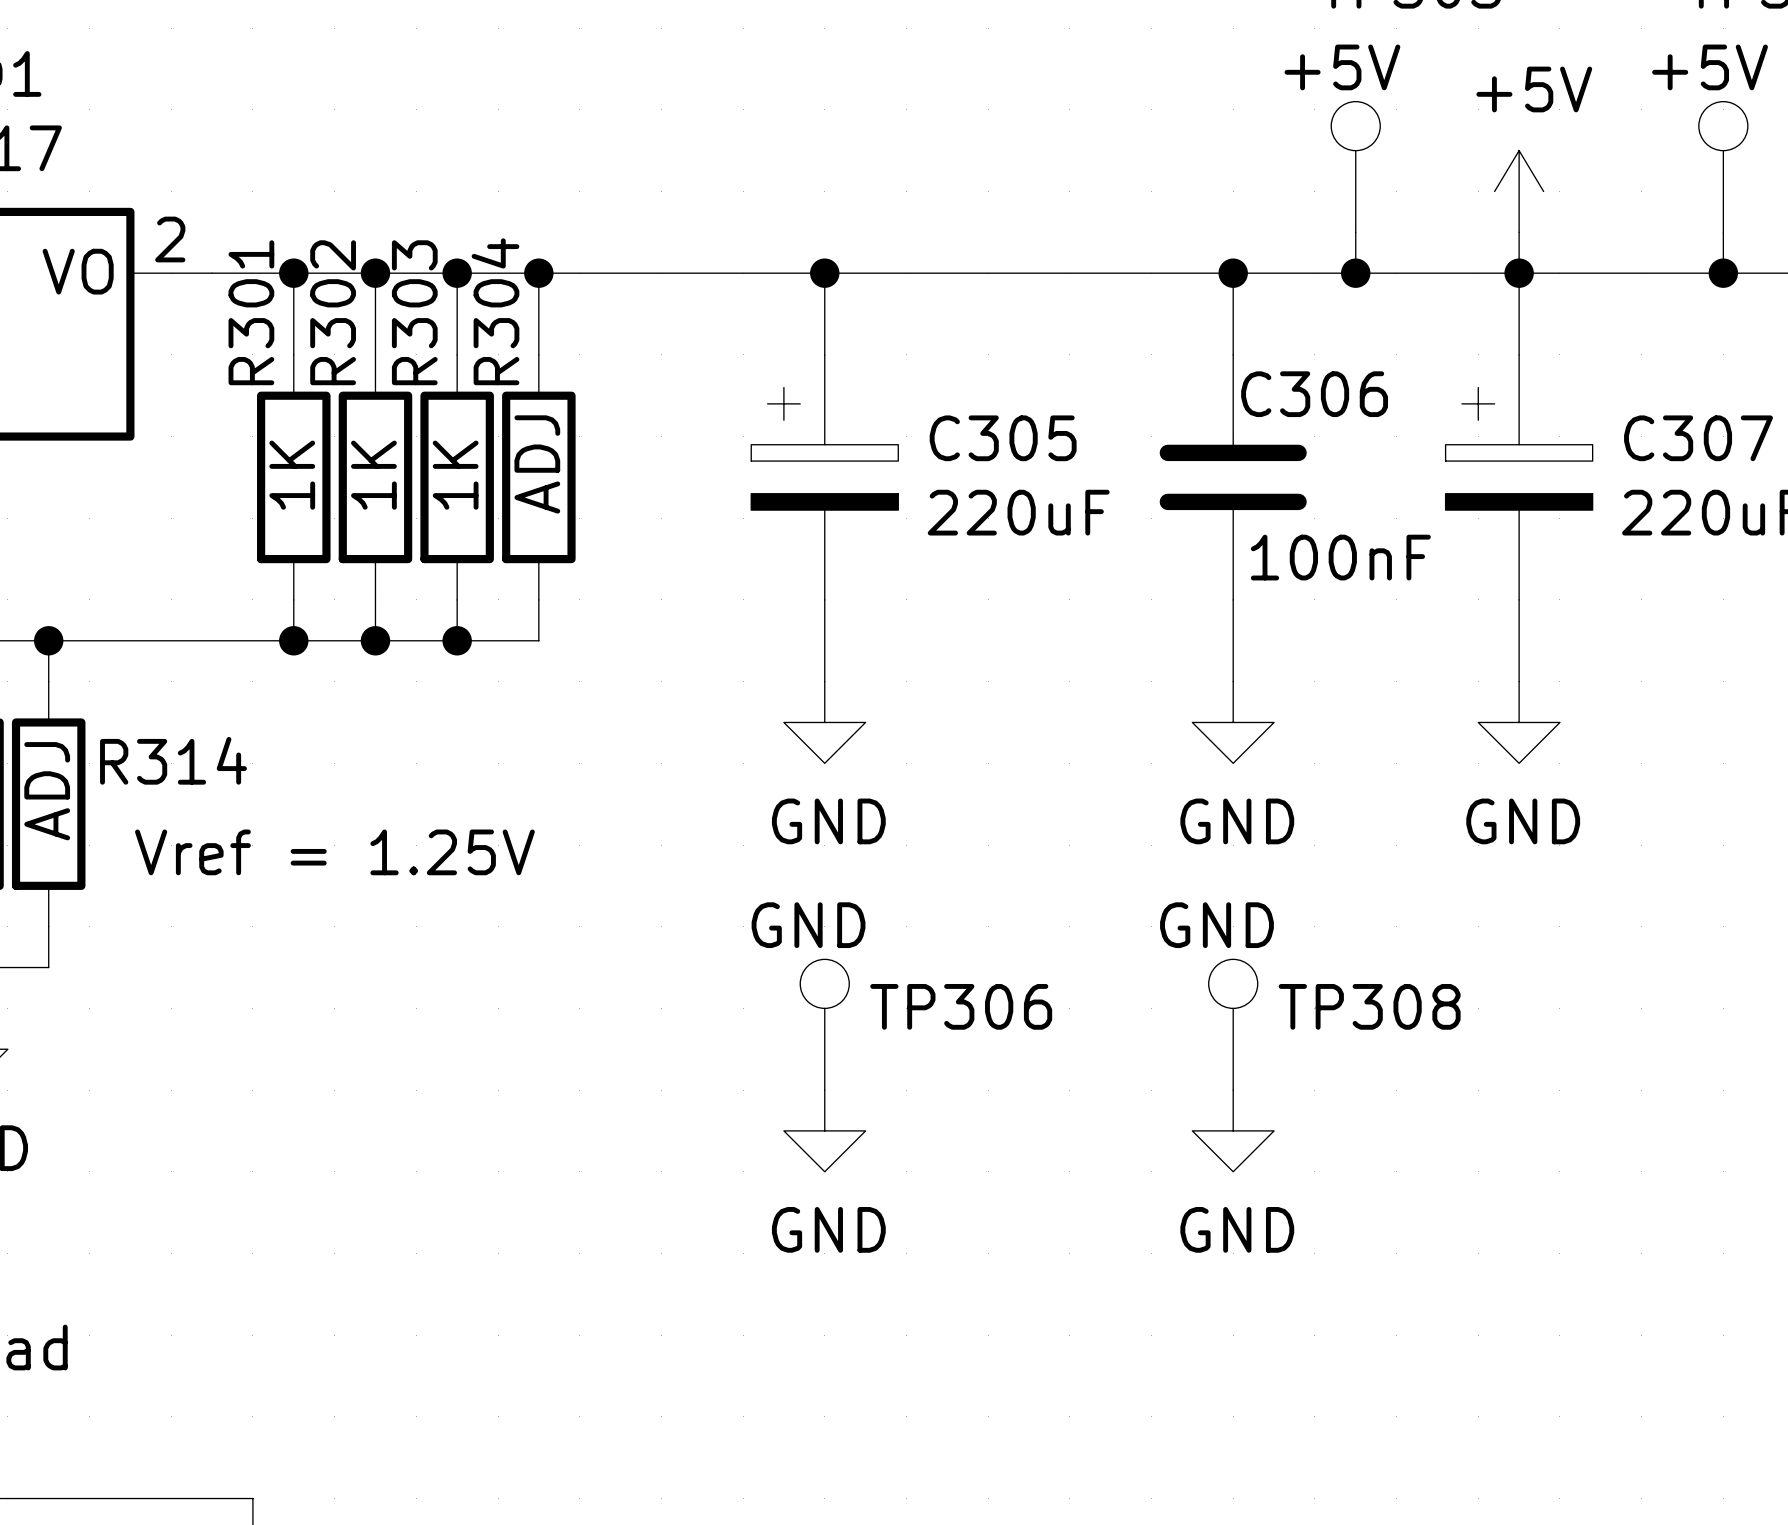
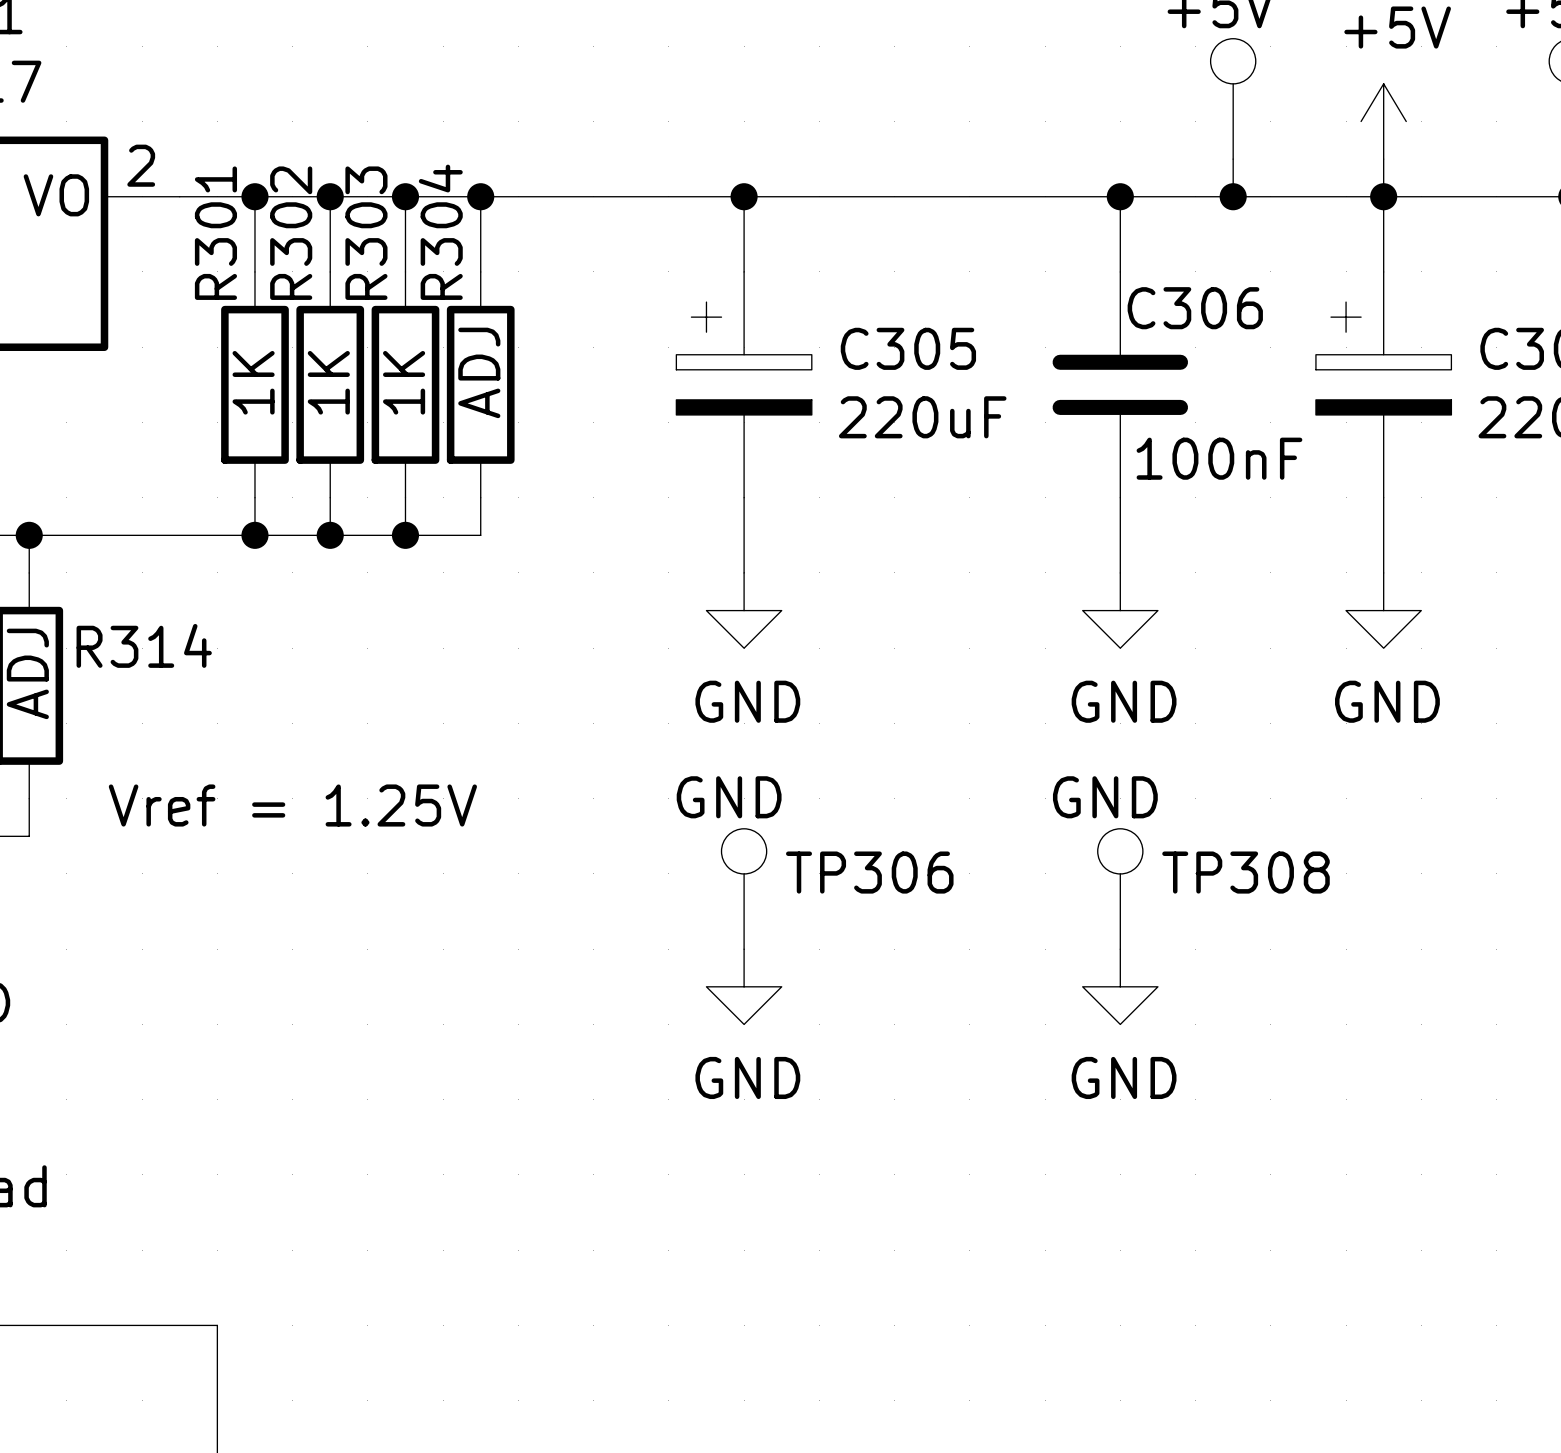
text position: Vref = 1.25V (334, 852) -> Vref = 1.25V (292, 805)

